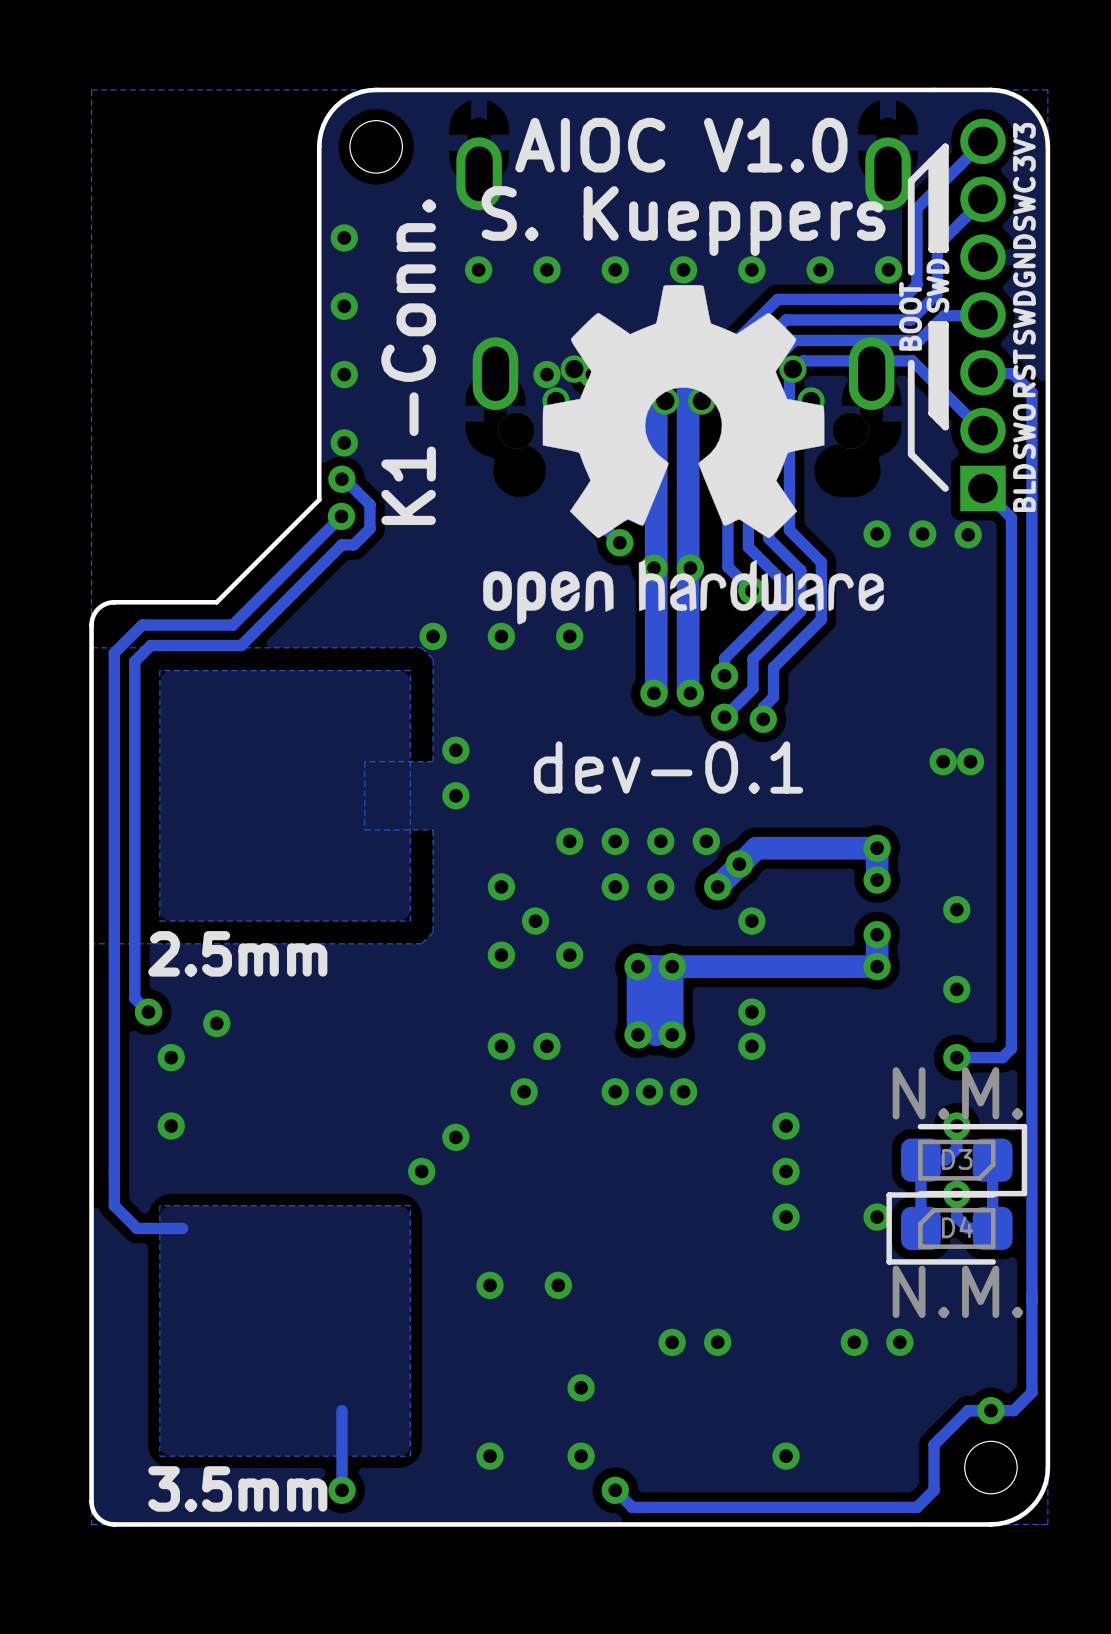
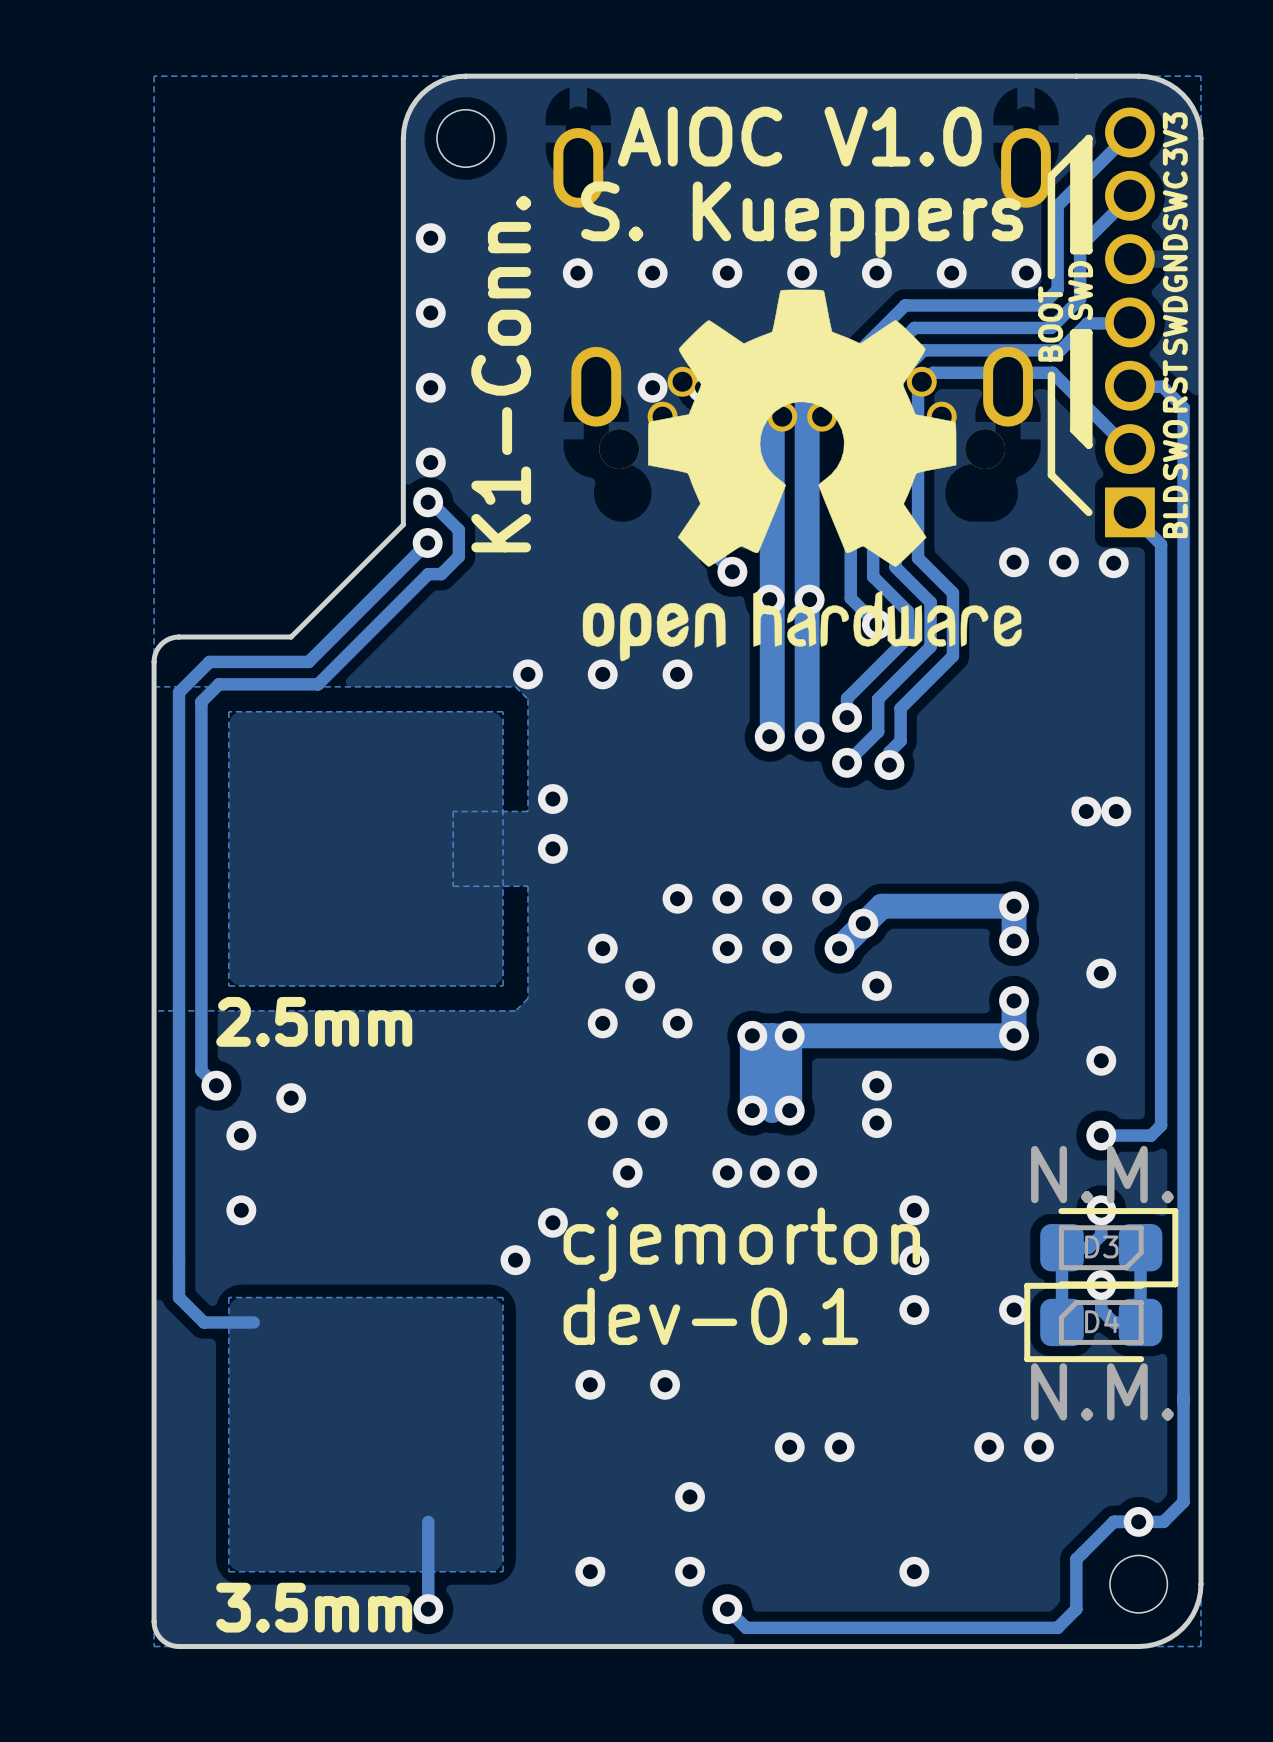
text position: dev-0.1 (668, 767) -> dev-0.1 (710, 1316)
text: none -> cjemorton (741, 1244)

